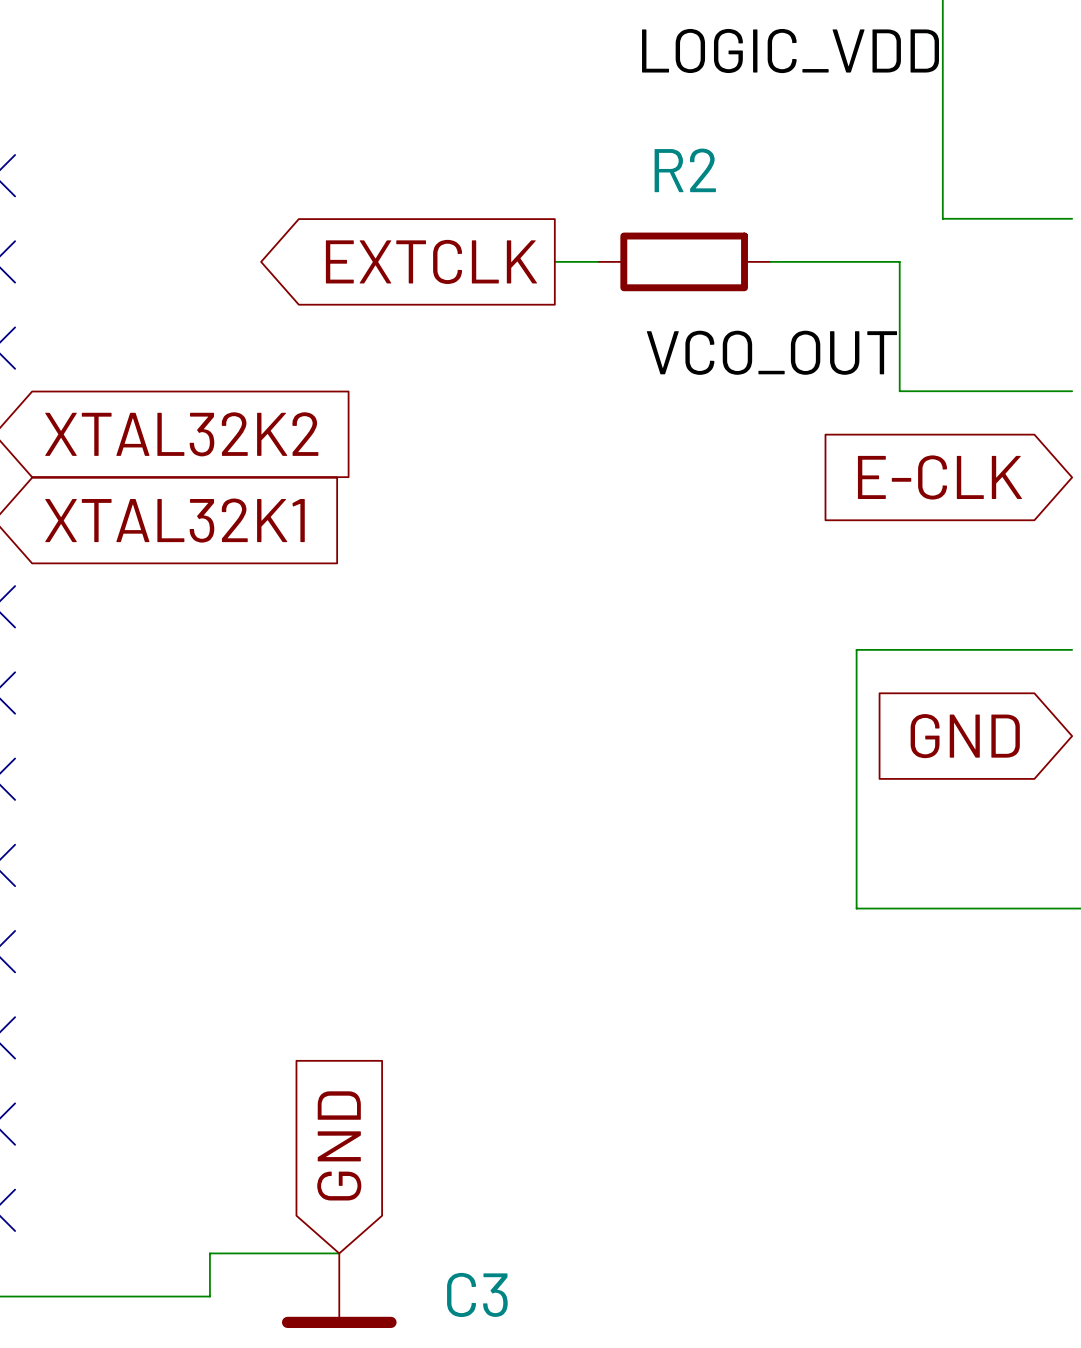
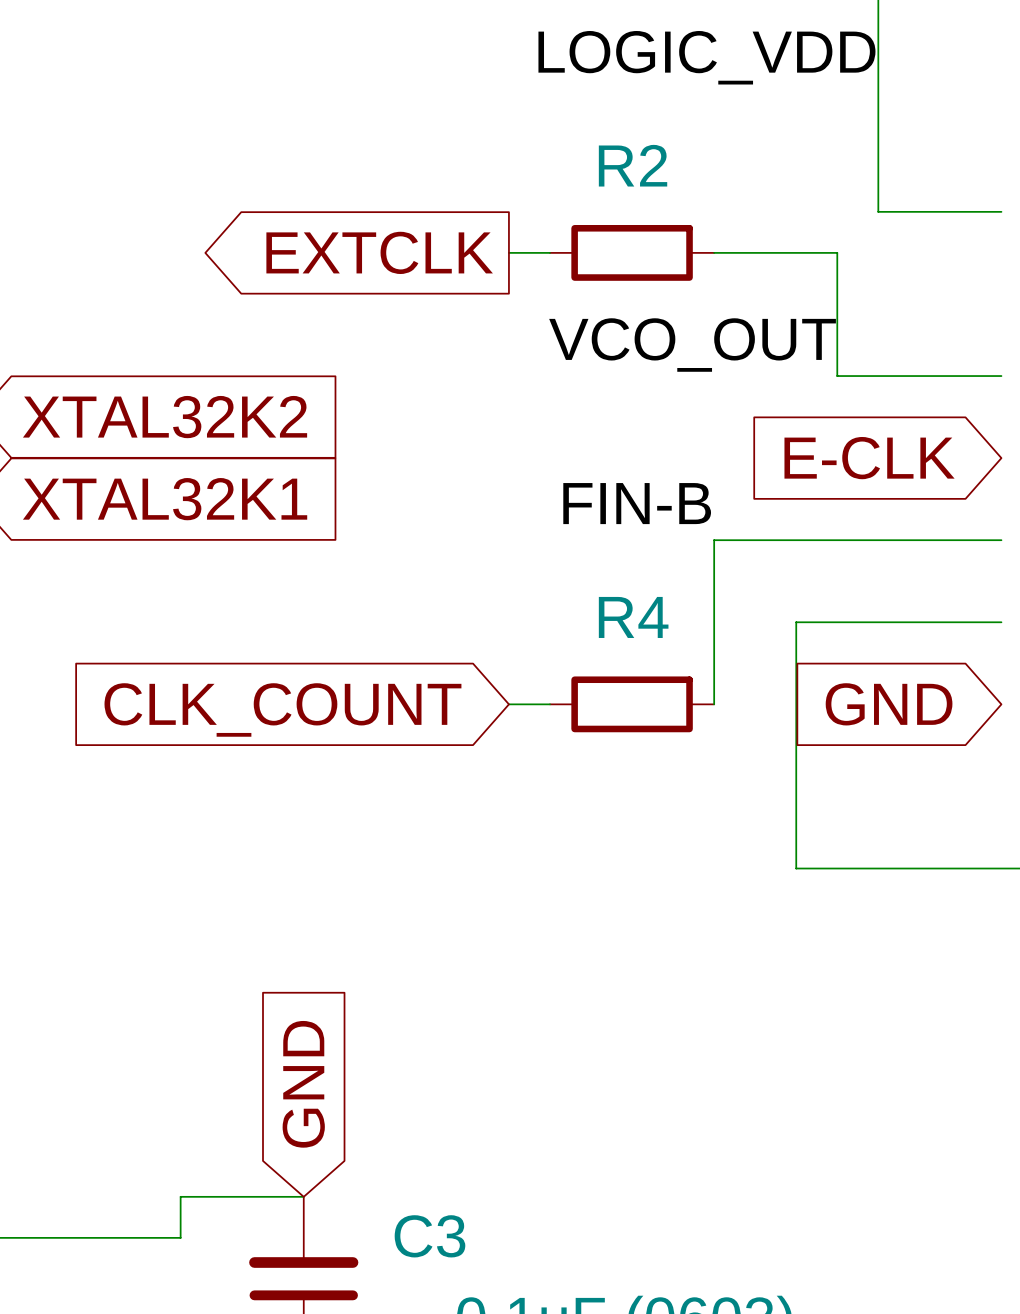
label: none -> FIN-B (637, 503)
wire: none -> (1001, 540) (714, 540) (714, 704)
global label: none -> CLK_COUNT (282, 709)
wire: none -> (508, 704) (550, 704)
R4: none -> (632, 704)

